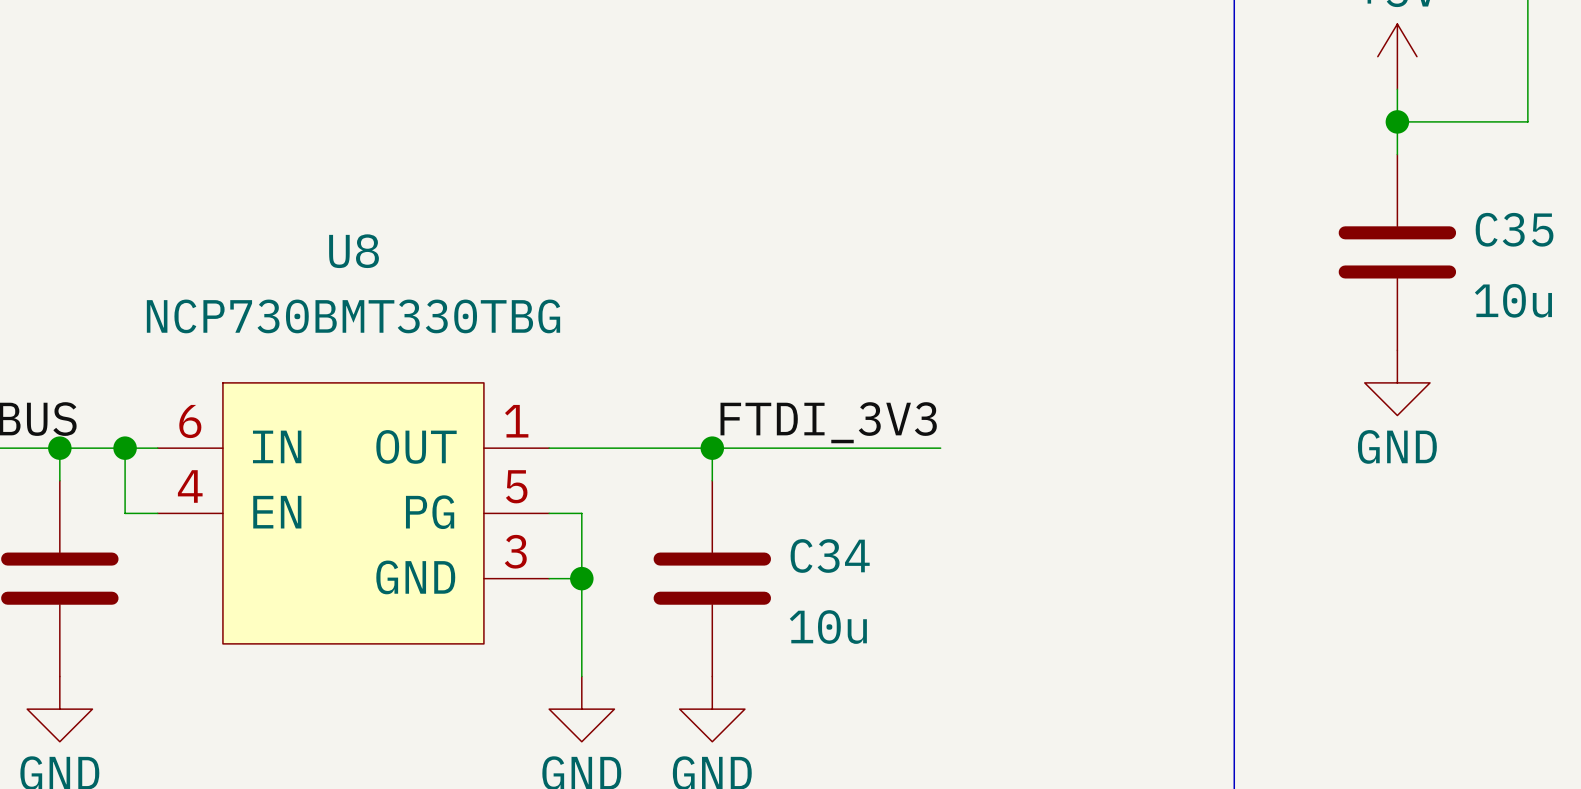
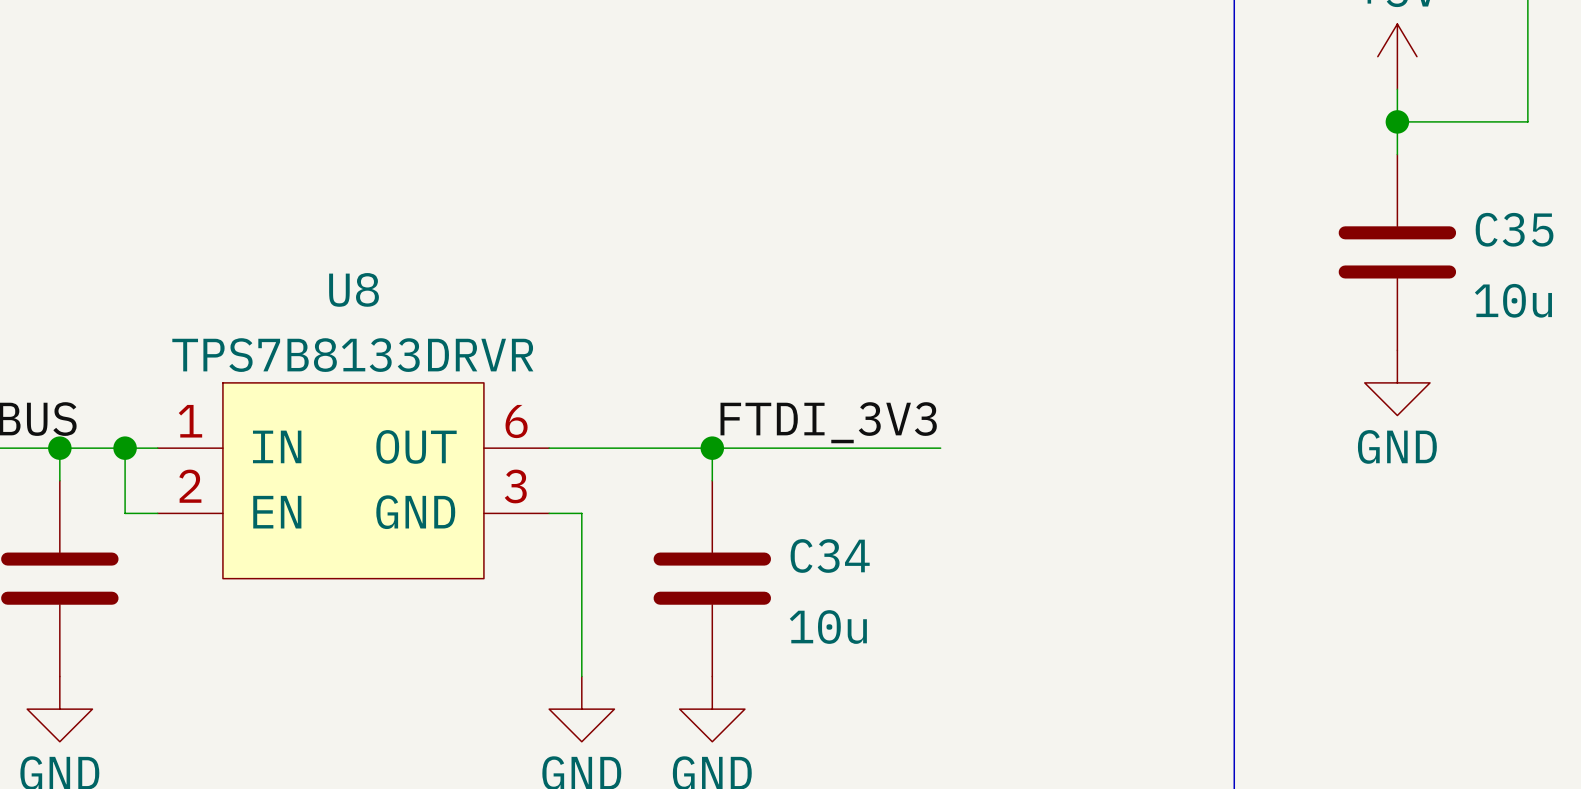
U8 name position: U8 (354, 251) -> U8 (354, 289)
U8 value: NCP730BMT330TBG (353, 316) -> TPS7B8133DRVR (352, 355)
U8 symbol: [157, 382, 550, 644] -> [157, 382, 550, 579]
wire: (549, 578) (581, 578) -> none
junction: (581, 578) -> none

